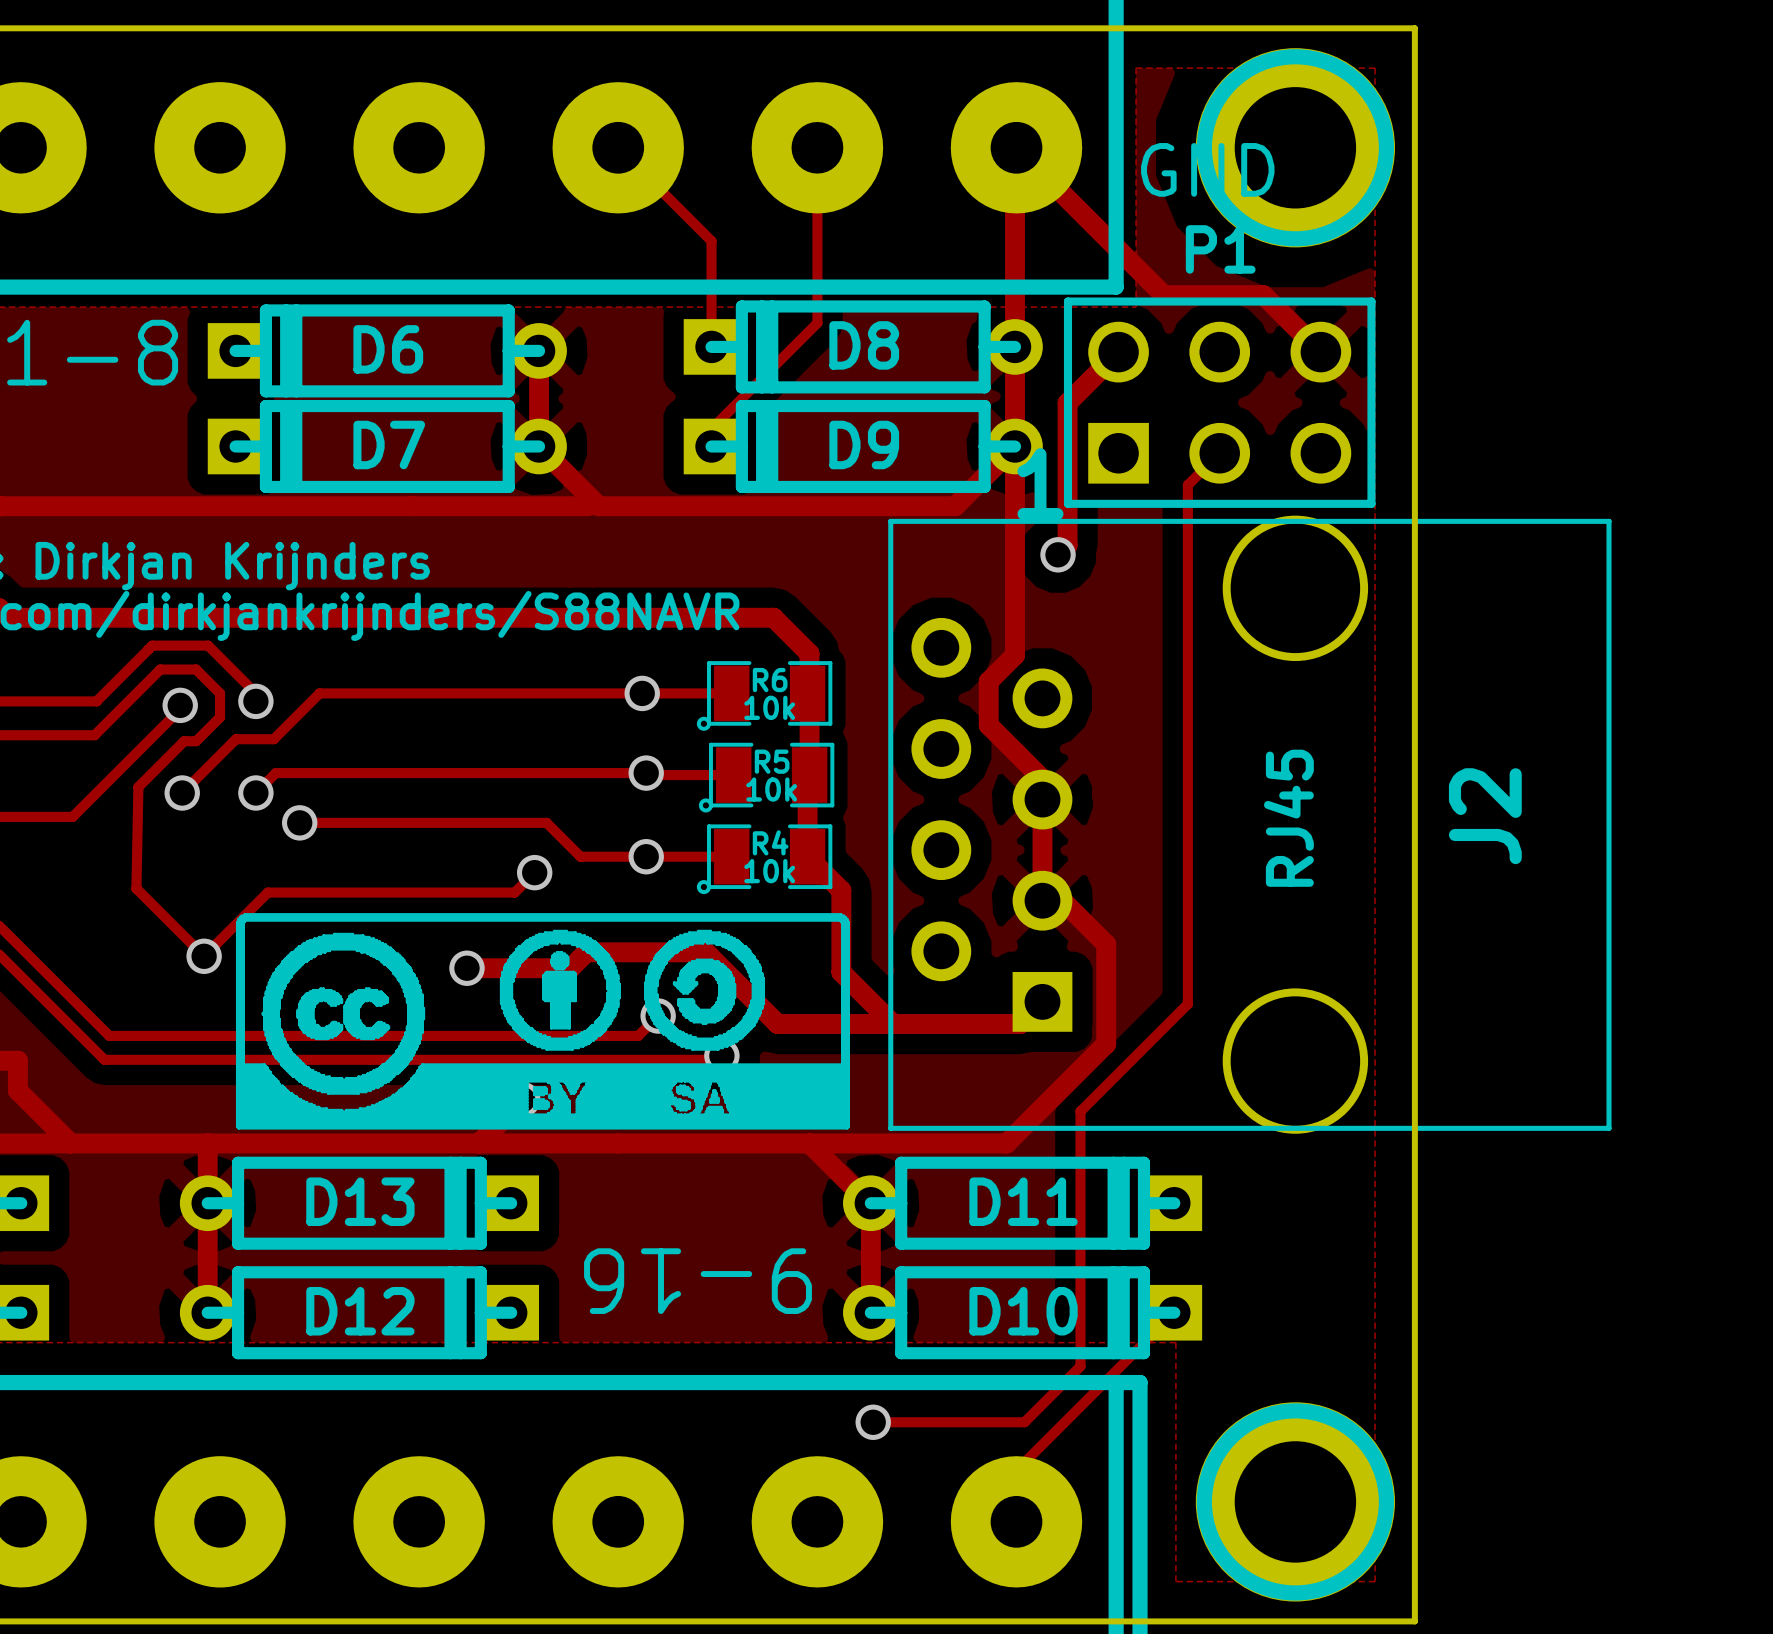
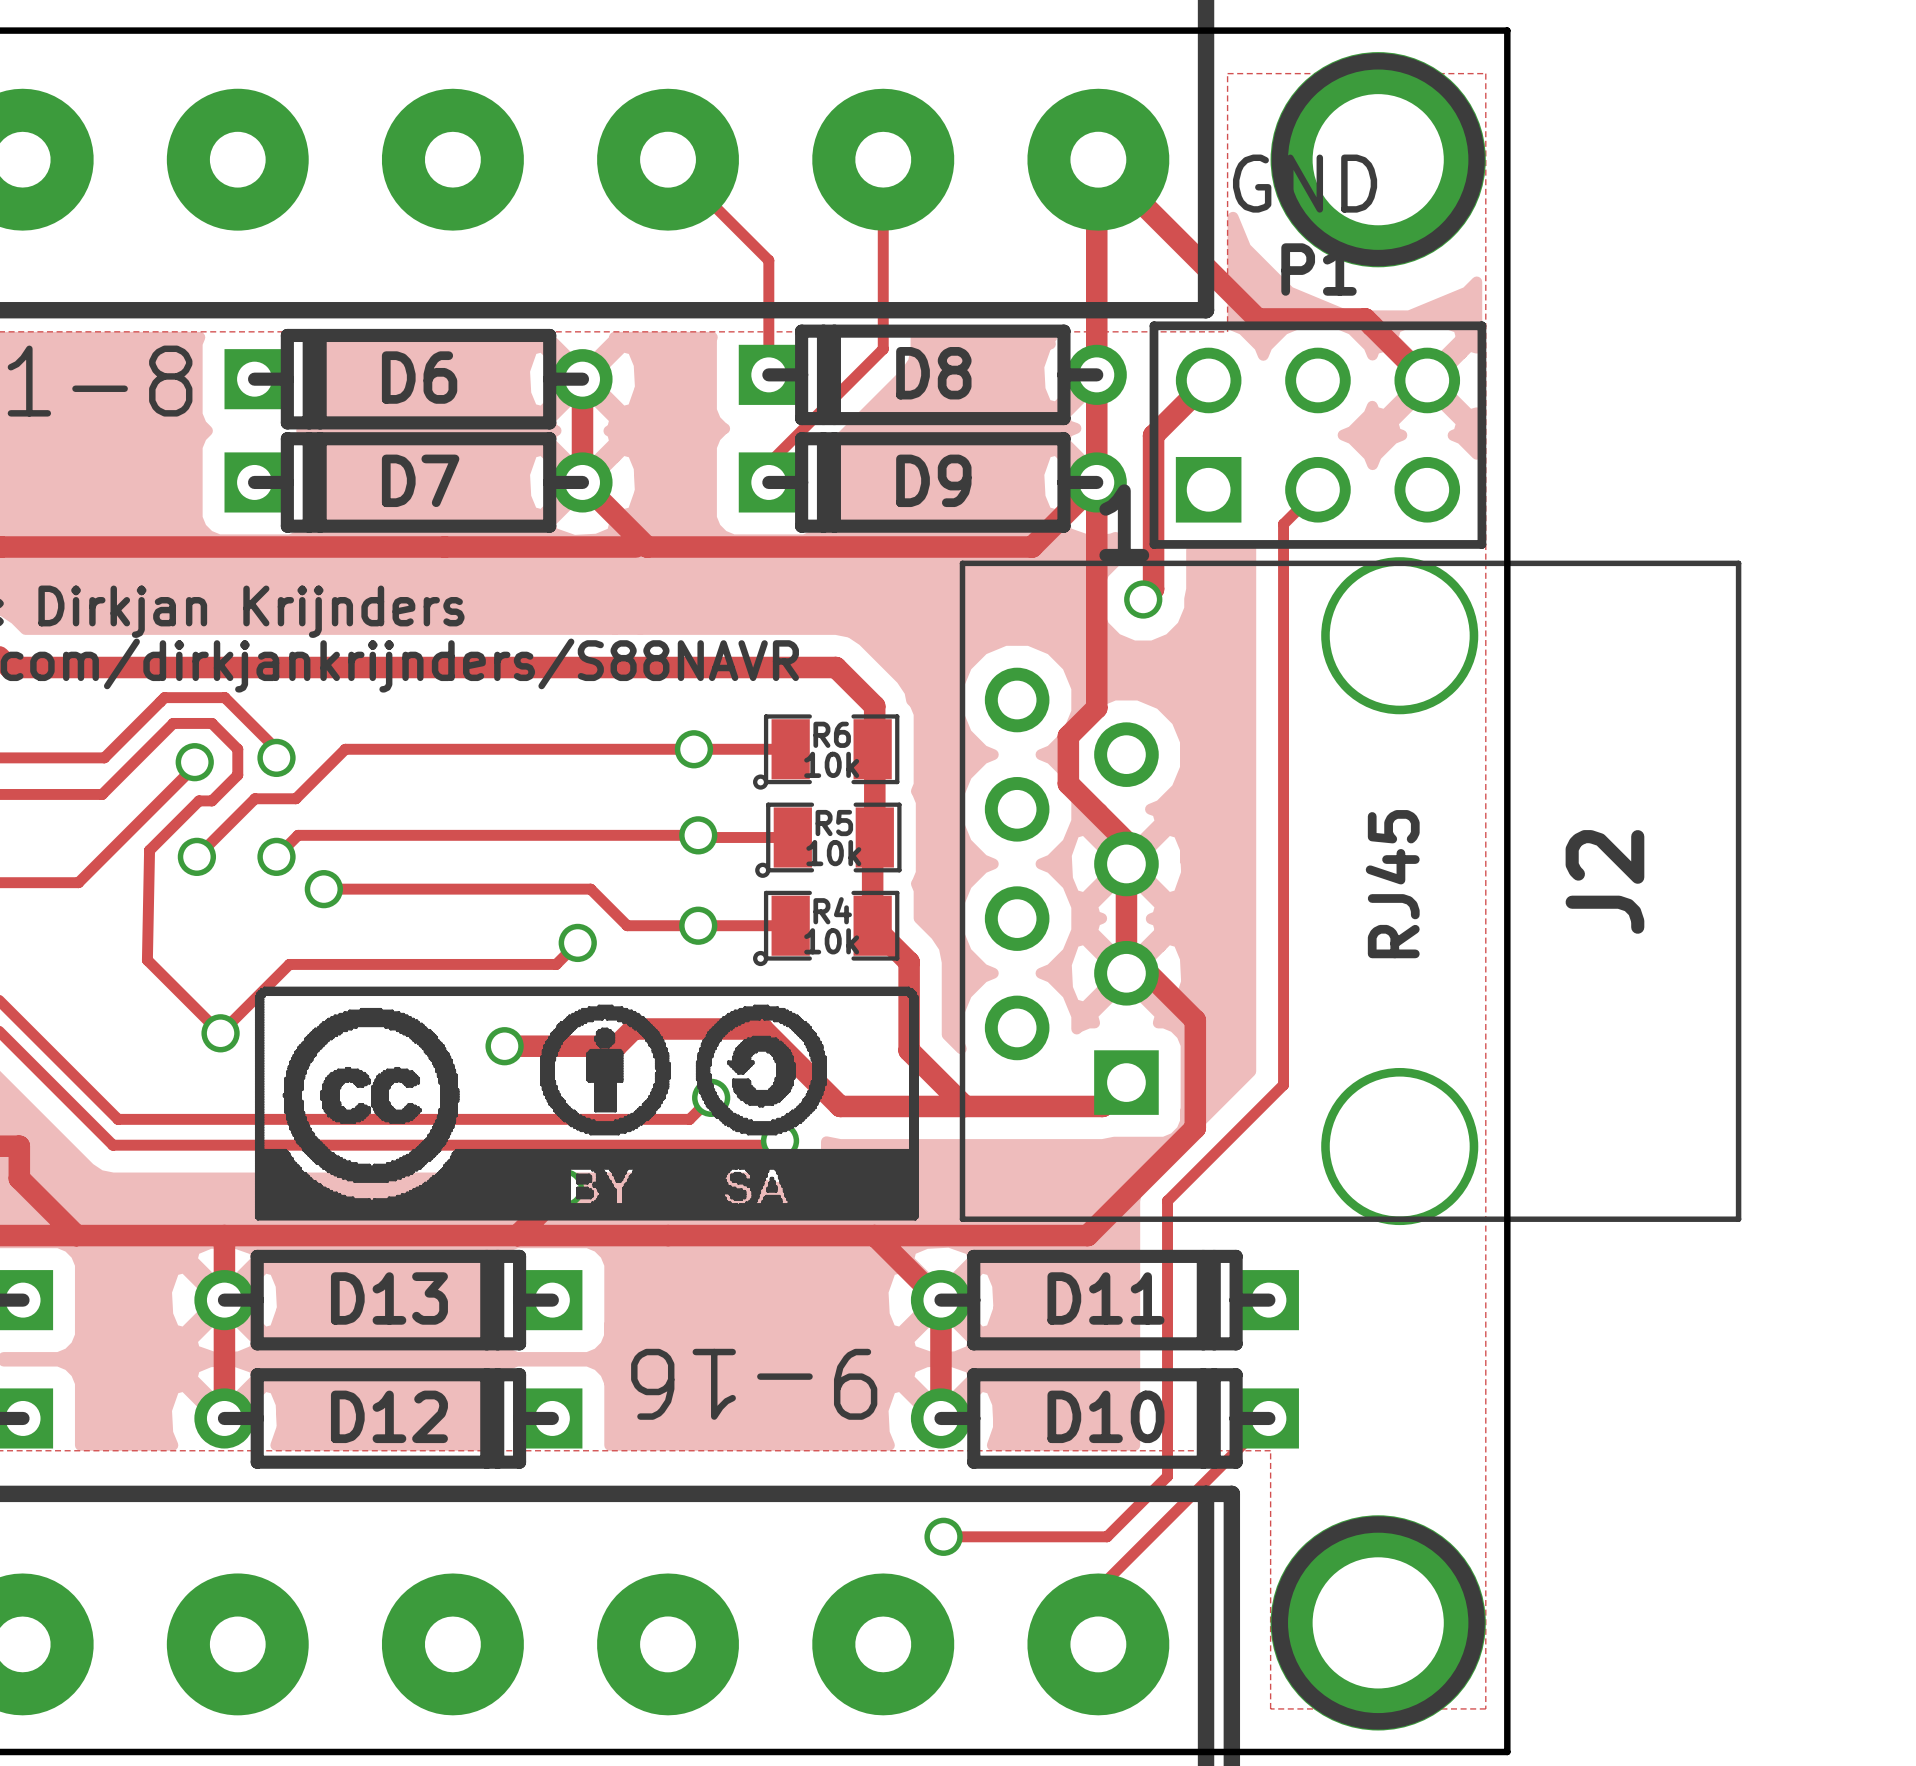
board edge: (1394, 28) (1414, 28) (1414, 1621) (1394, 1621) -> (1507, 30) (1507, 1751)
part position: (1295, 147) -> (1378, 159)
part position: (1295, 1501) -> (1378, 1622)

